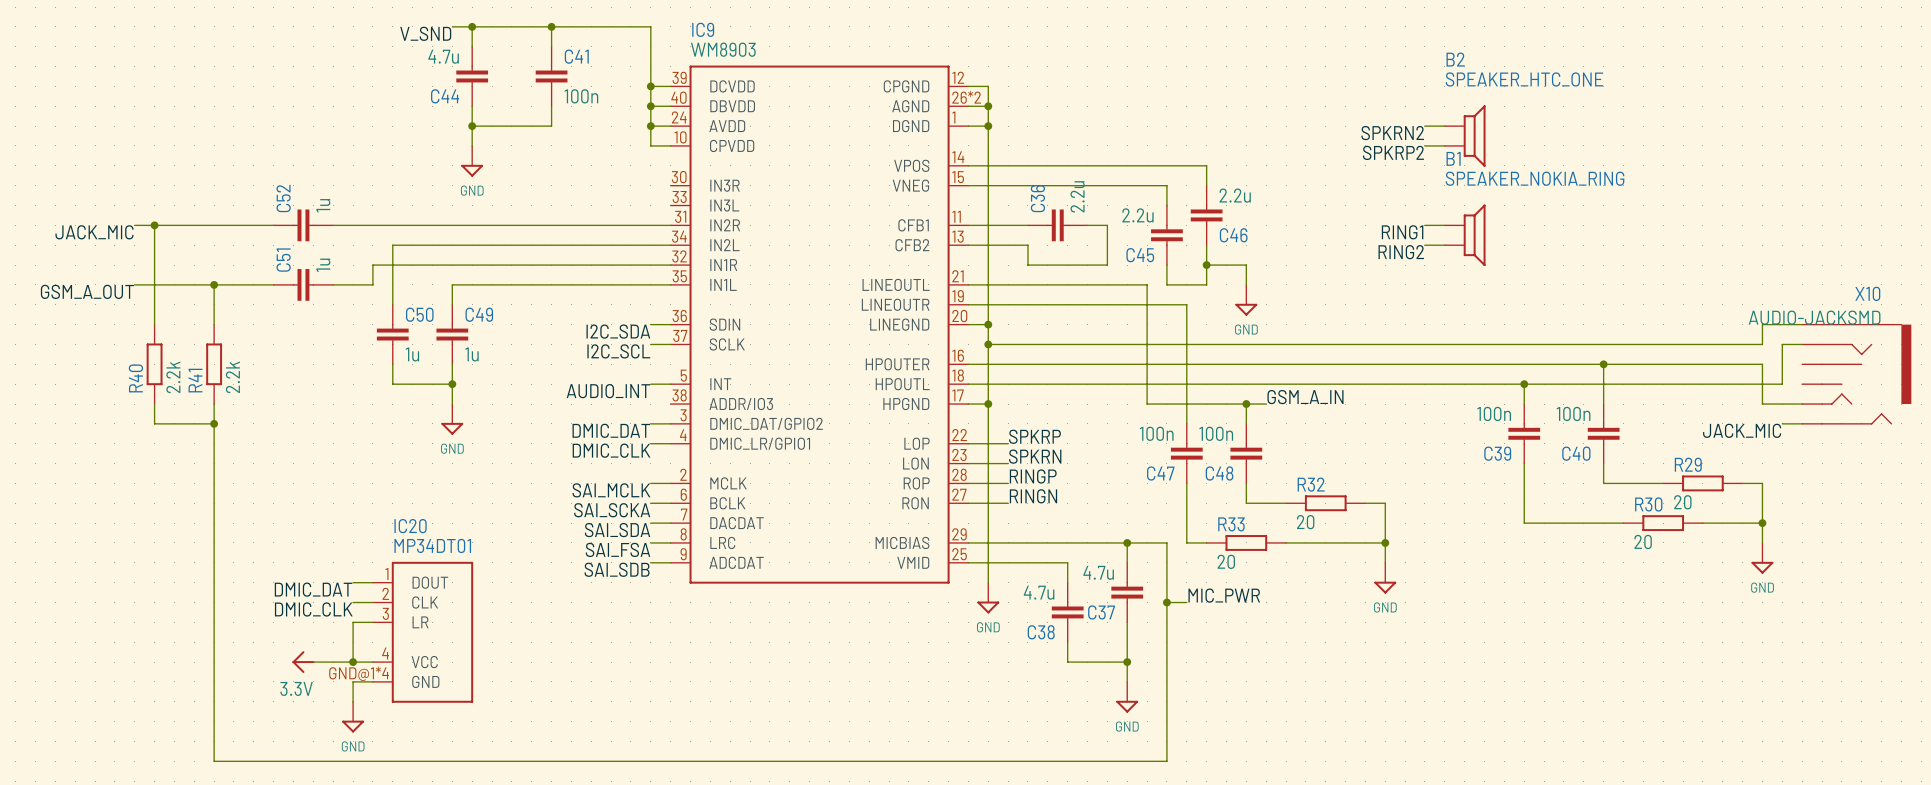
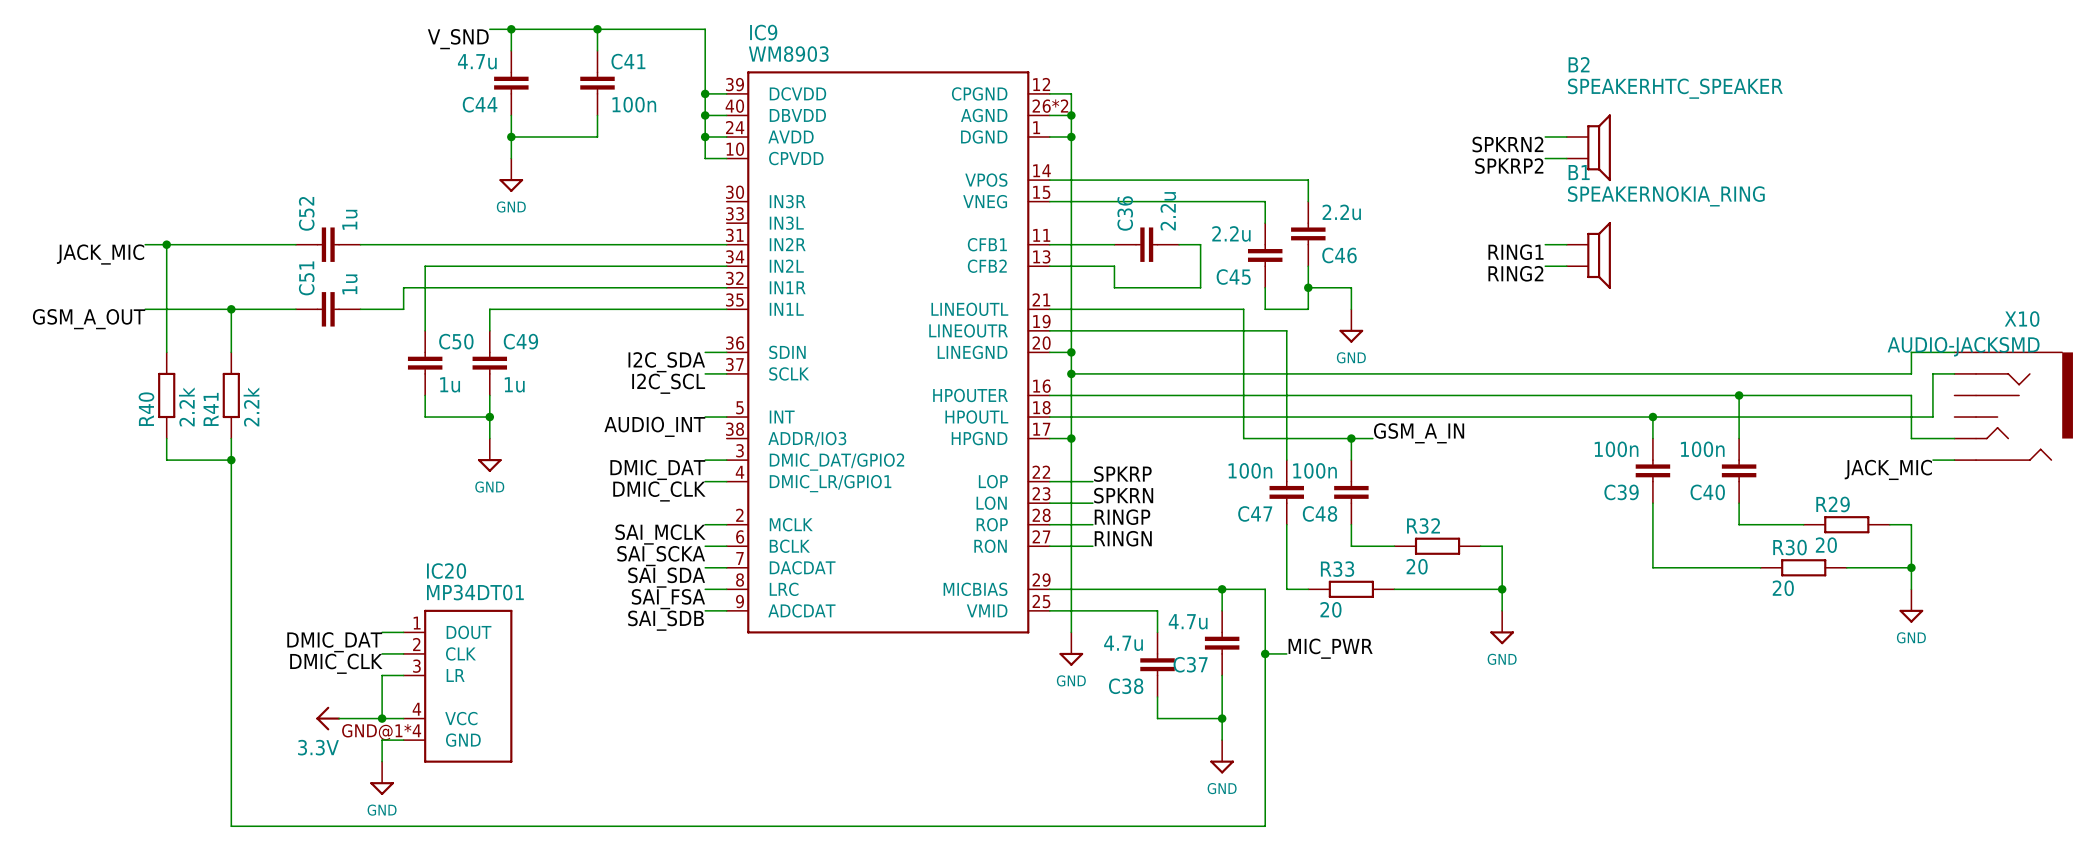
B2 value: SPEAKER_HTC_ONE (1524, 79) -> SPEAKERHTC_SPEAKER (1675, 88)
B1 value: SPEAKER_NOKIA_RING (1535, 178) -> SPEAKERNOKIA_RING (1666, 196)

